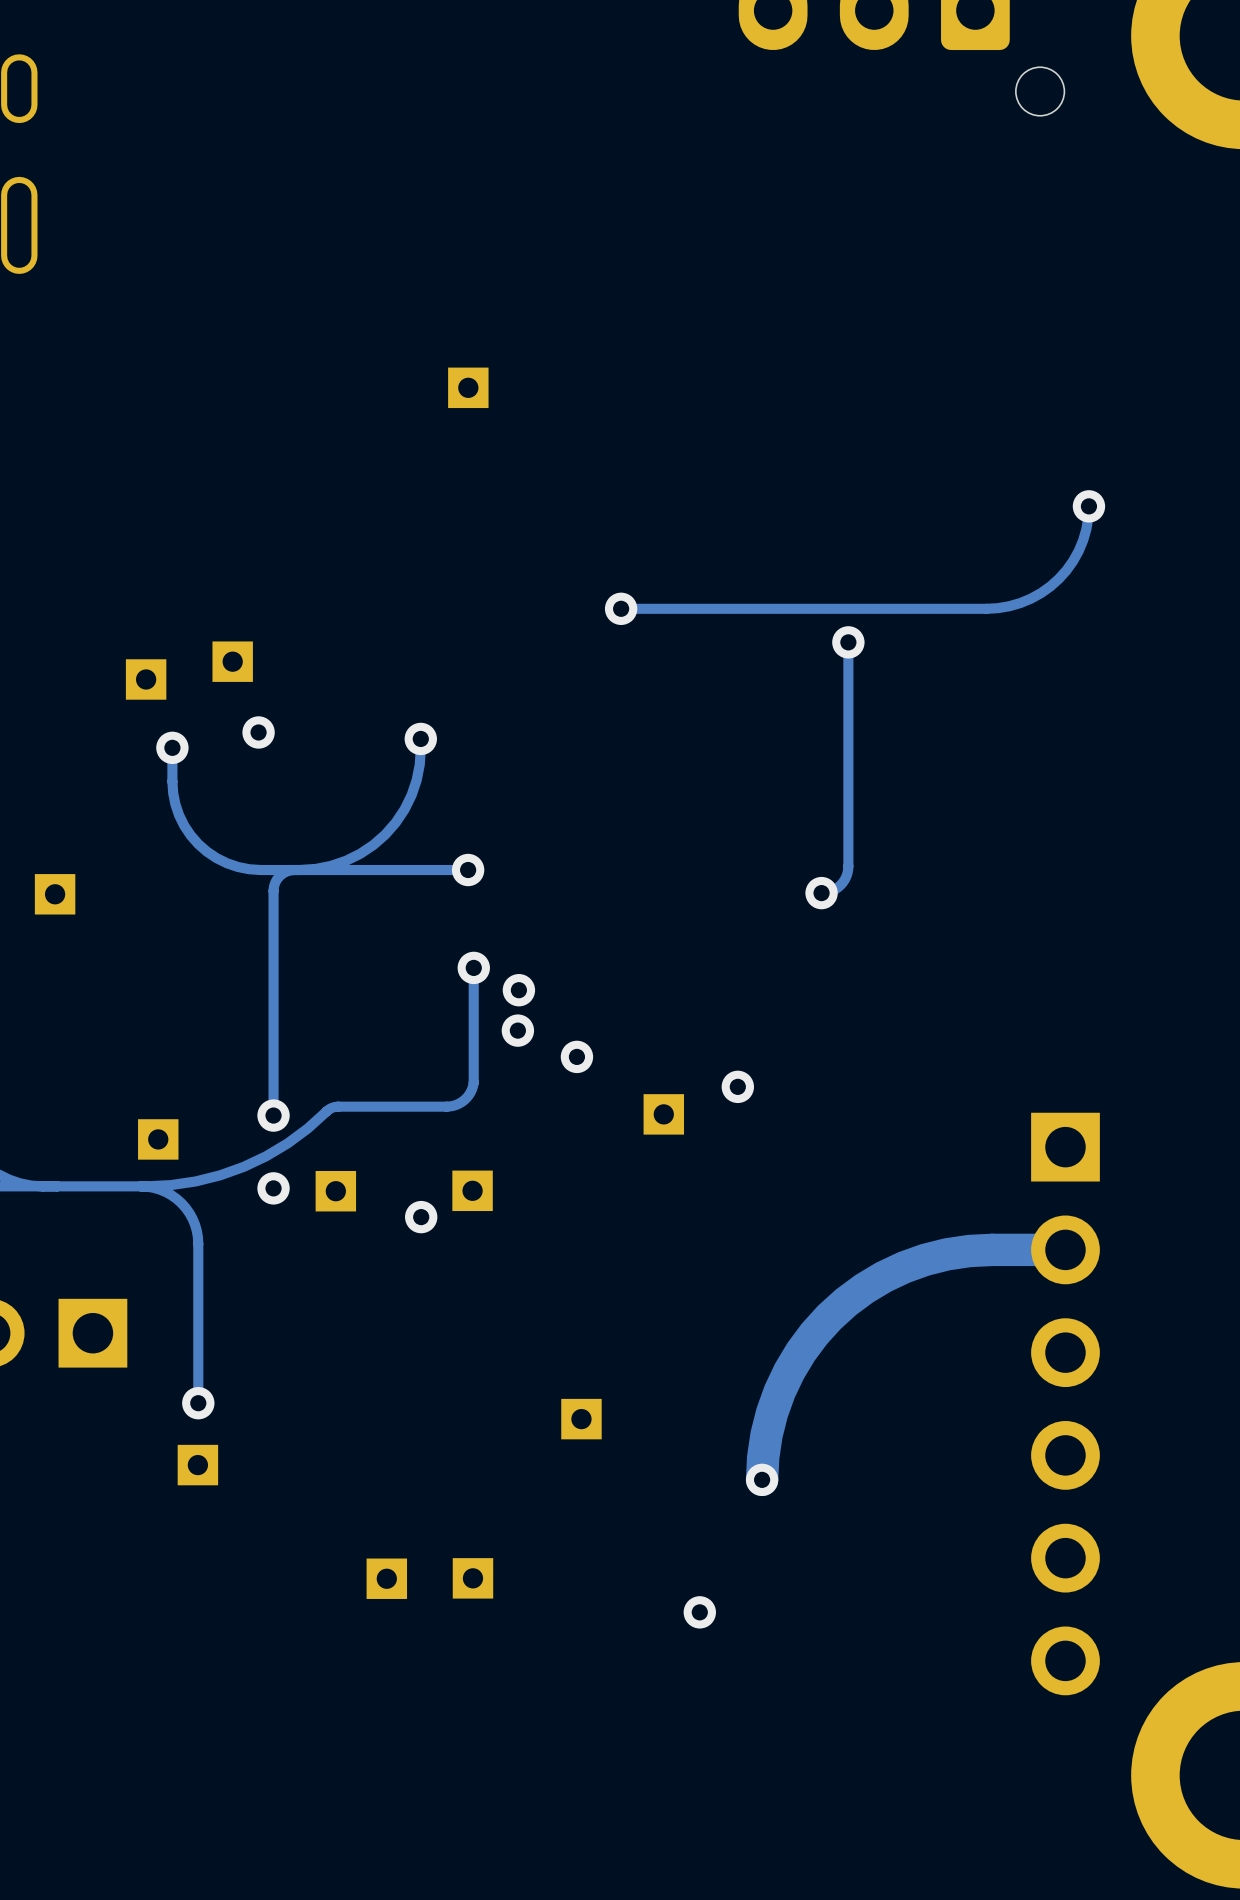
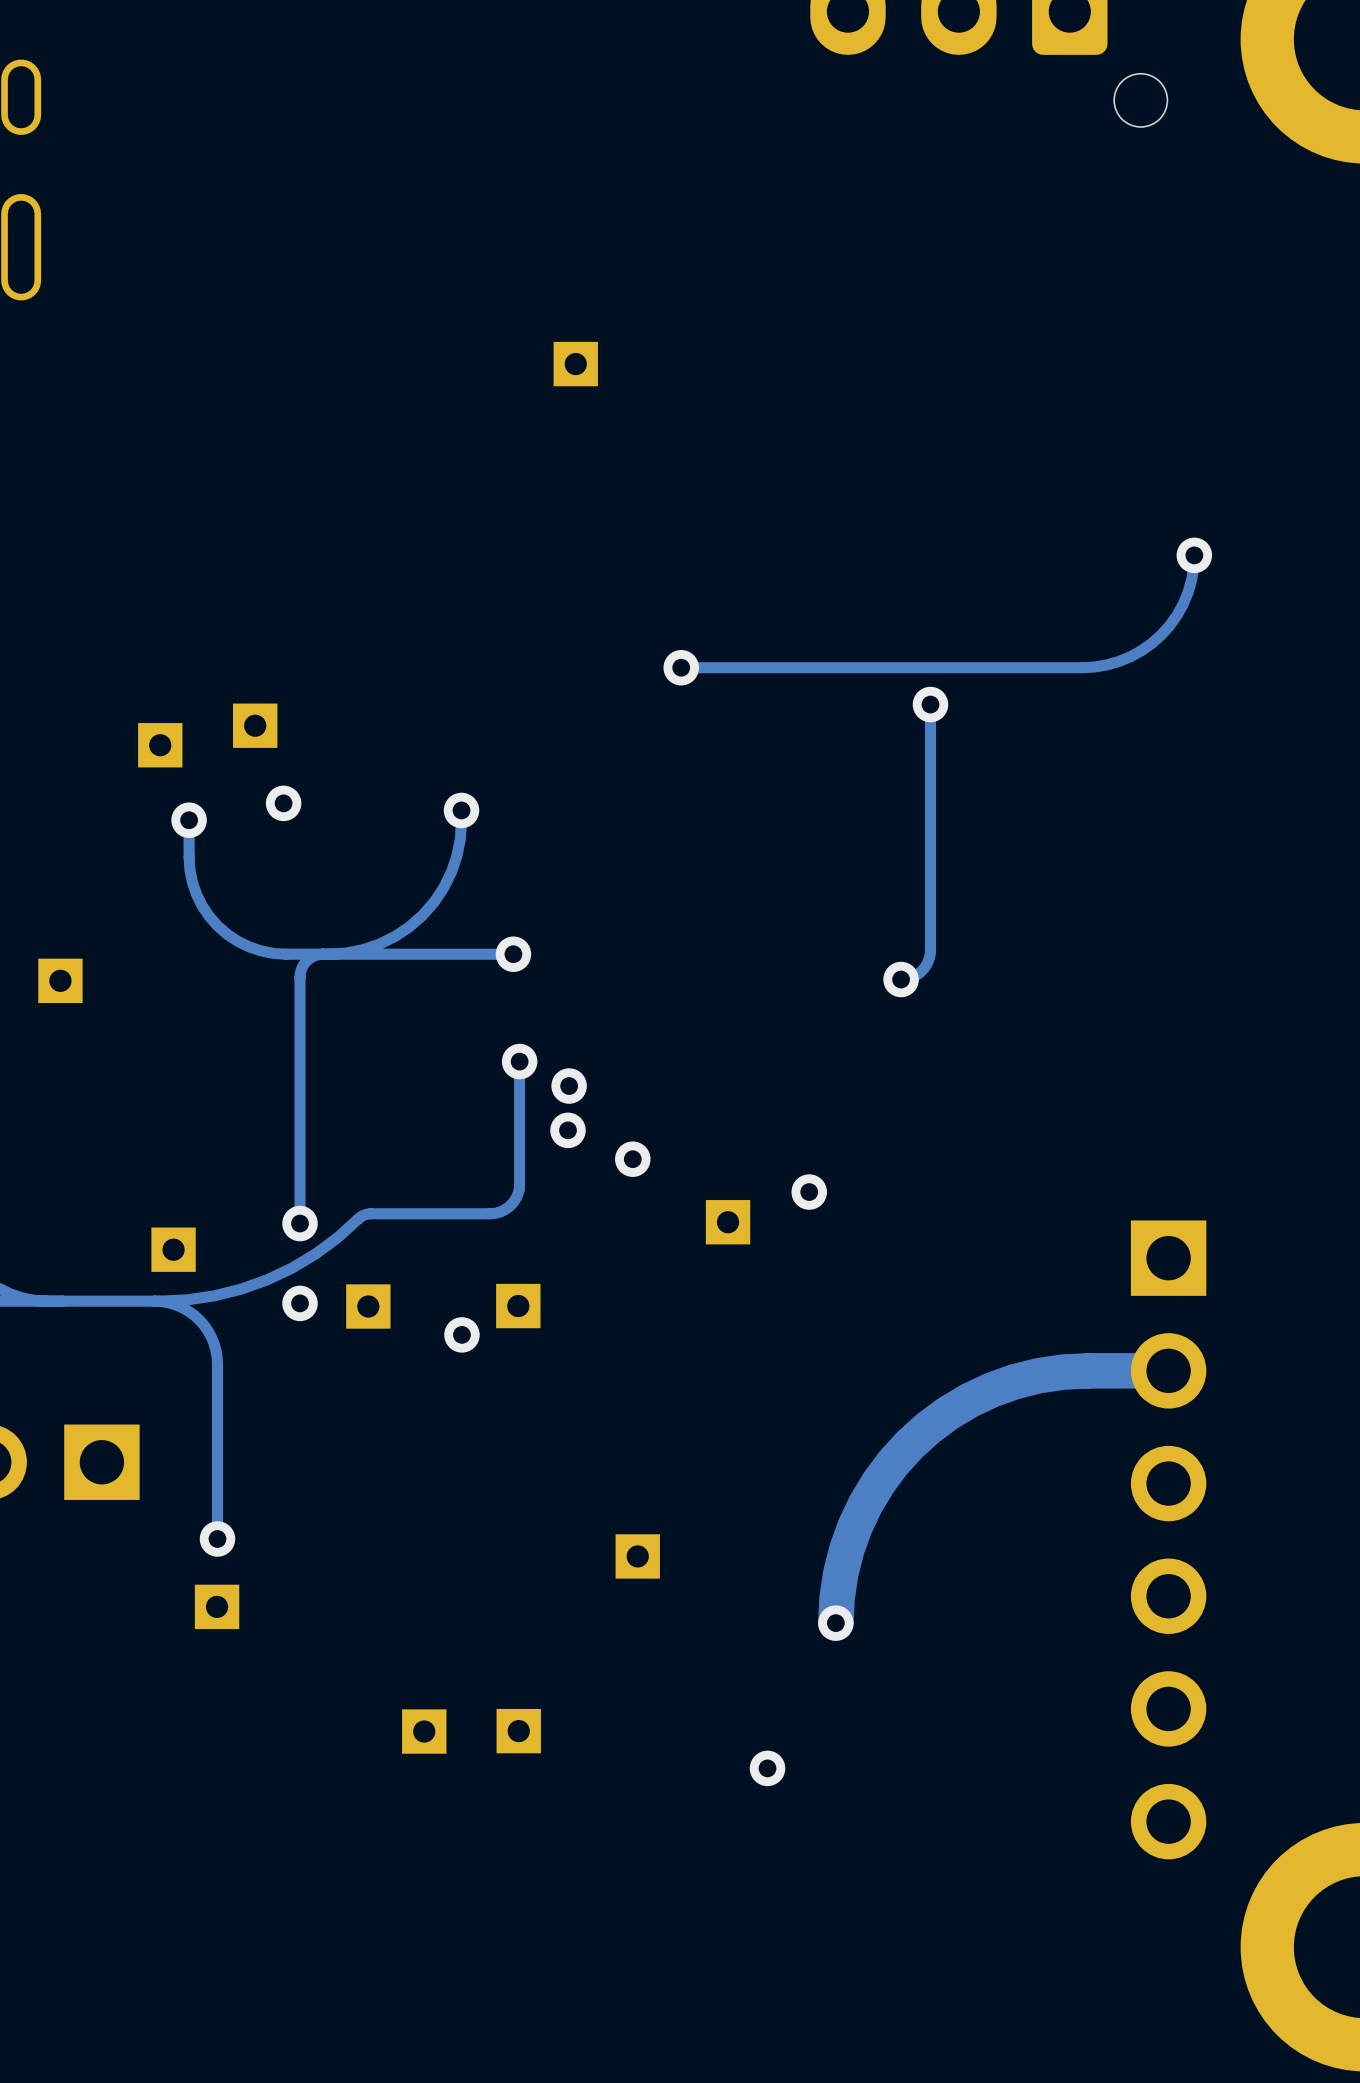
part position: (468, 387) -> (575, 364)

